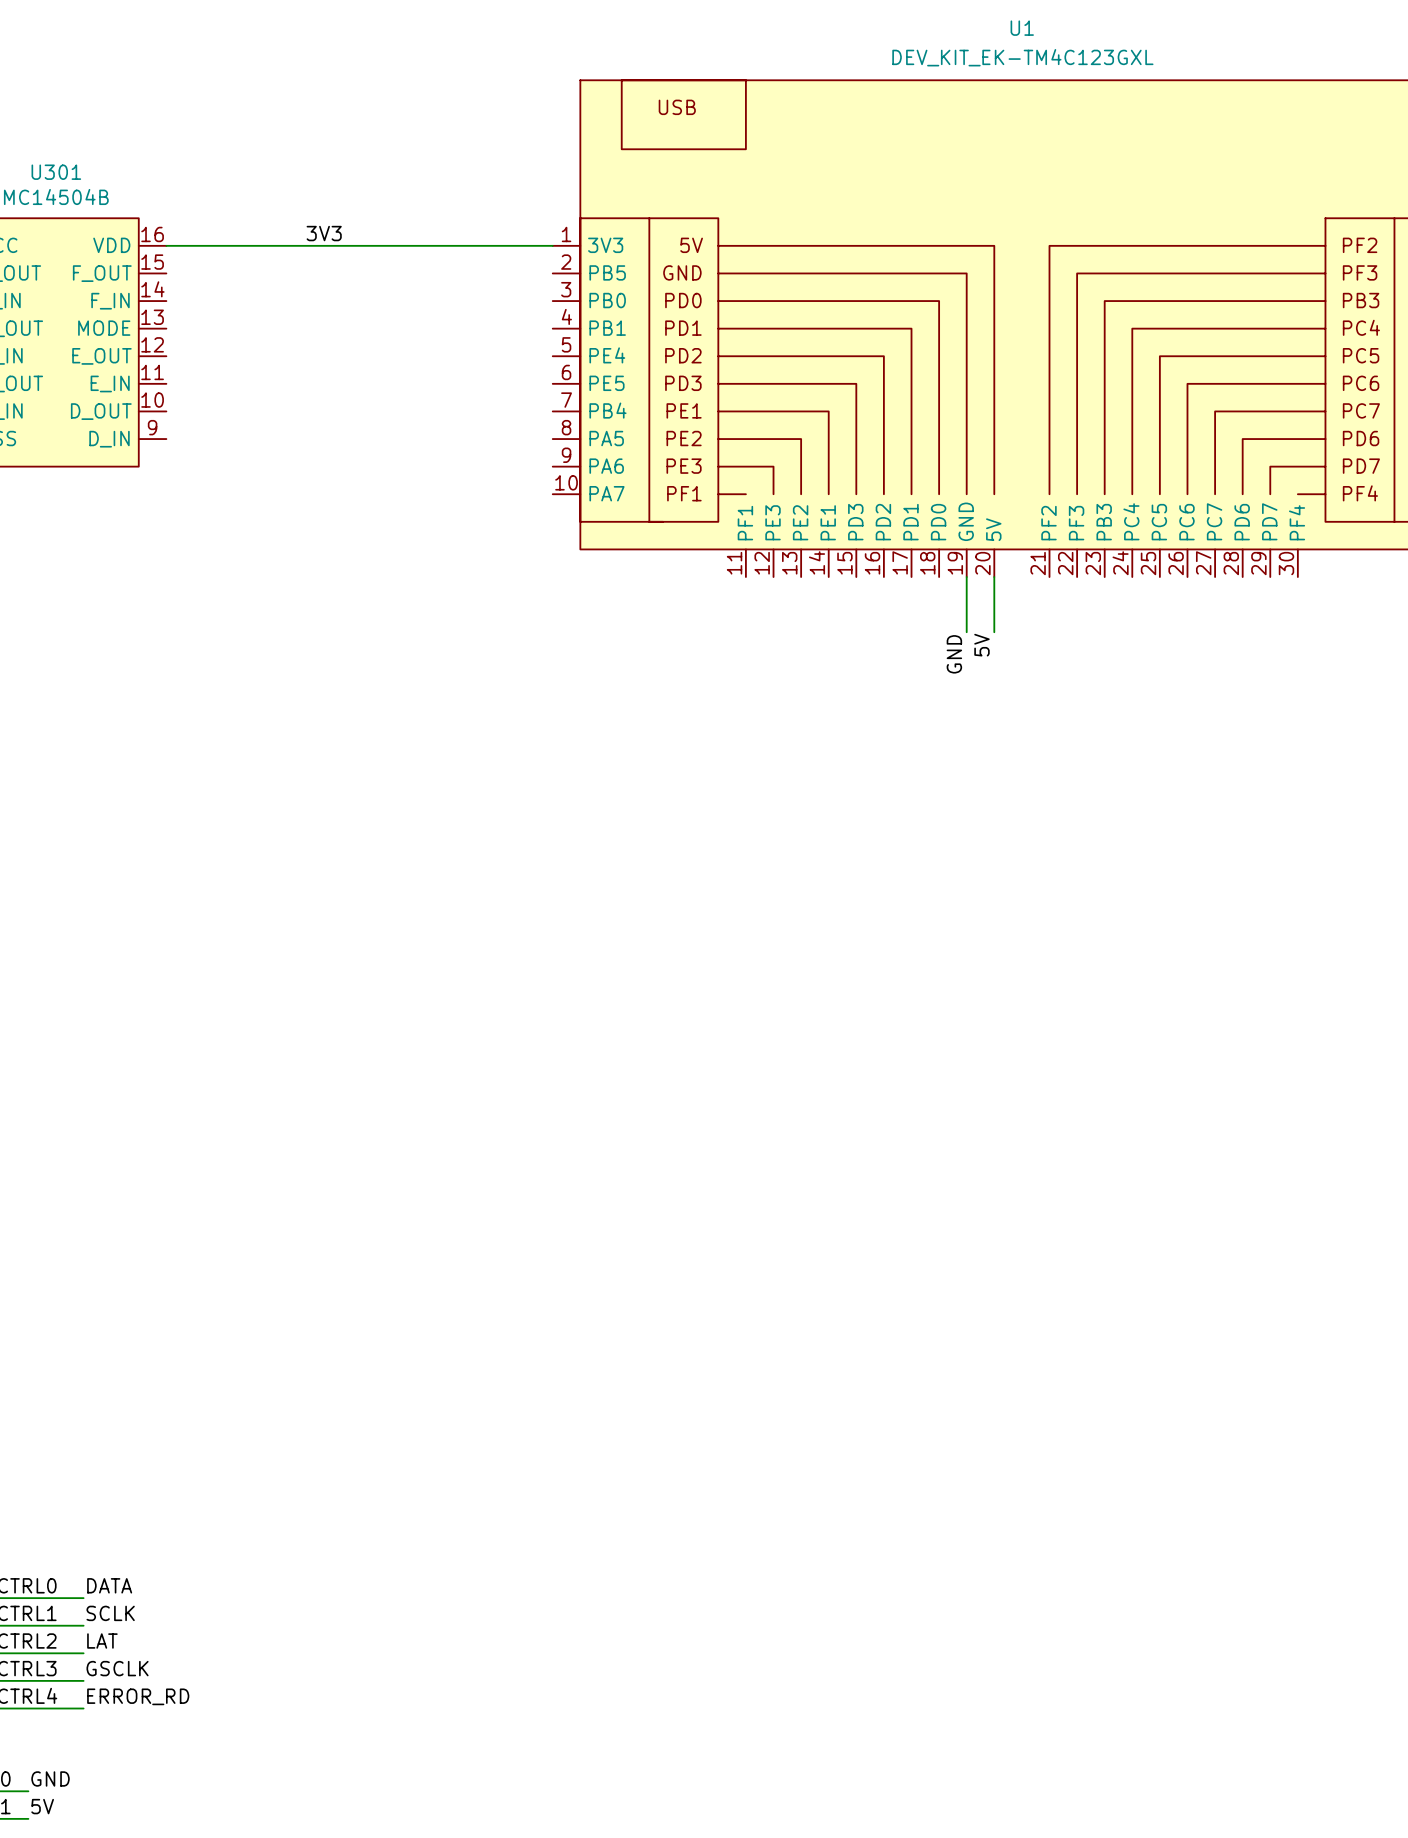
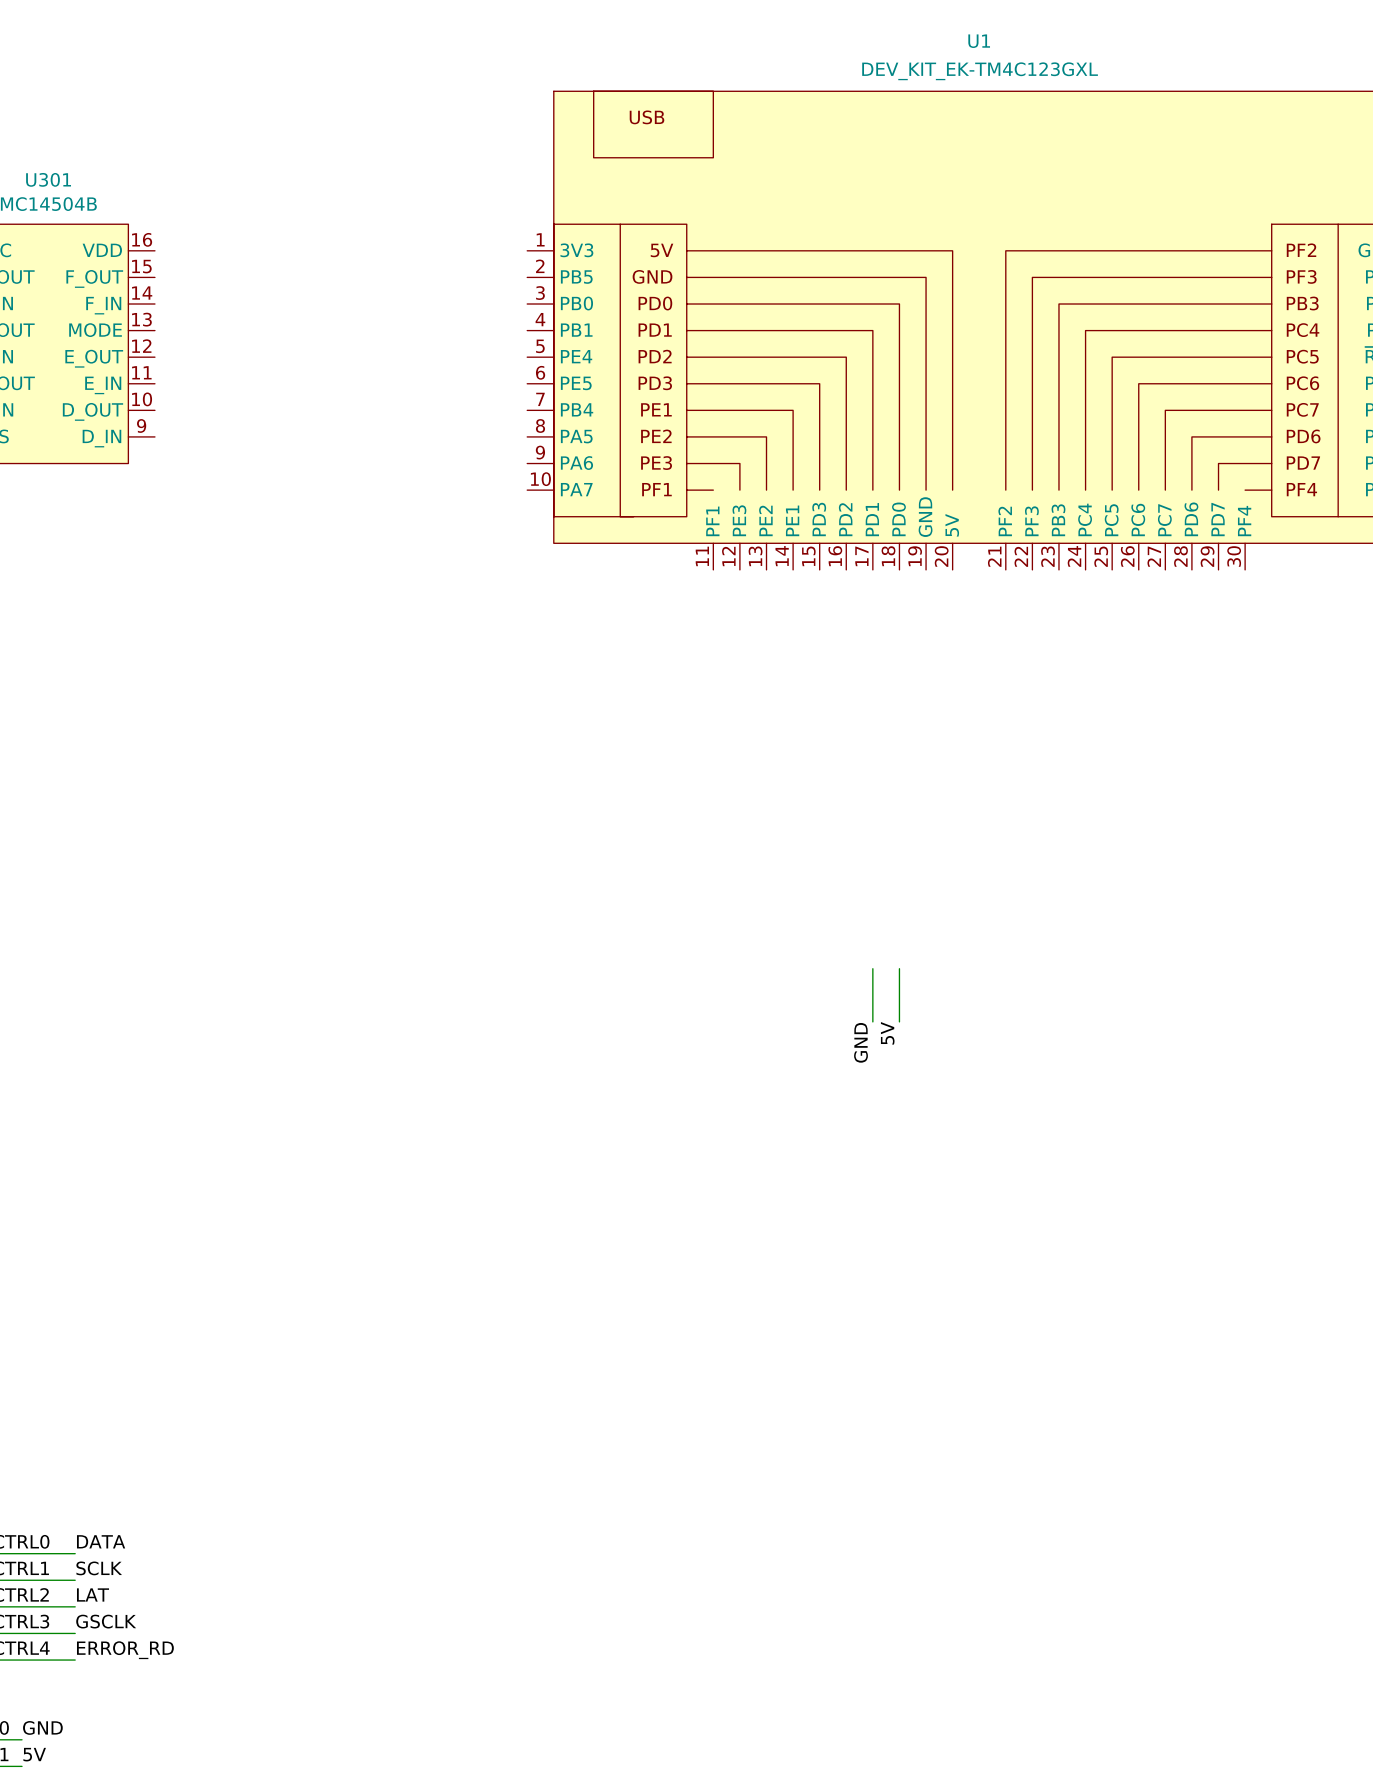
label: 3V3 (324, 233) -> none
wire: (166, 245) (552, 245) -> none
wire: (966, 577) (966, 632) -> none
wire: (994, 577) (994, 632) -> none
label: 5V (981, 645) -> none
label: GND (954, 654) -> none
wire: none -> (872, 968) (872, 1021)
wire: none -> (899, 968) (899, 1021)
label: none -> 5V (887, 1033)
label: none -> GND (861, 1042)

